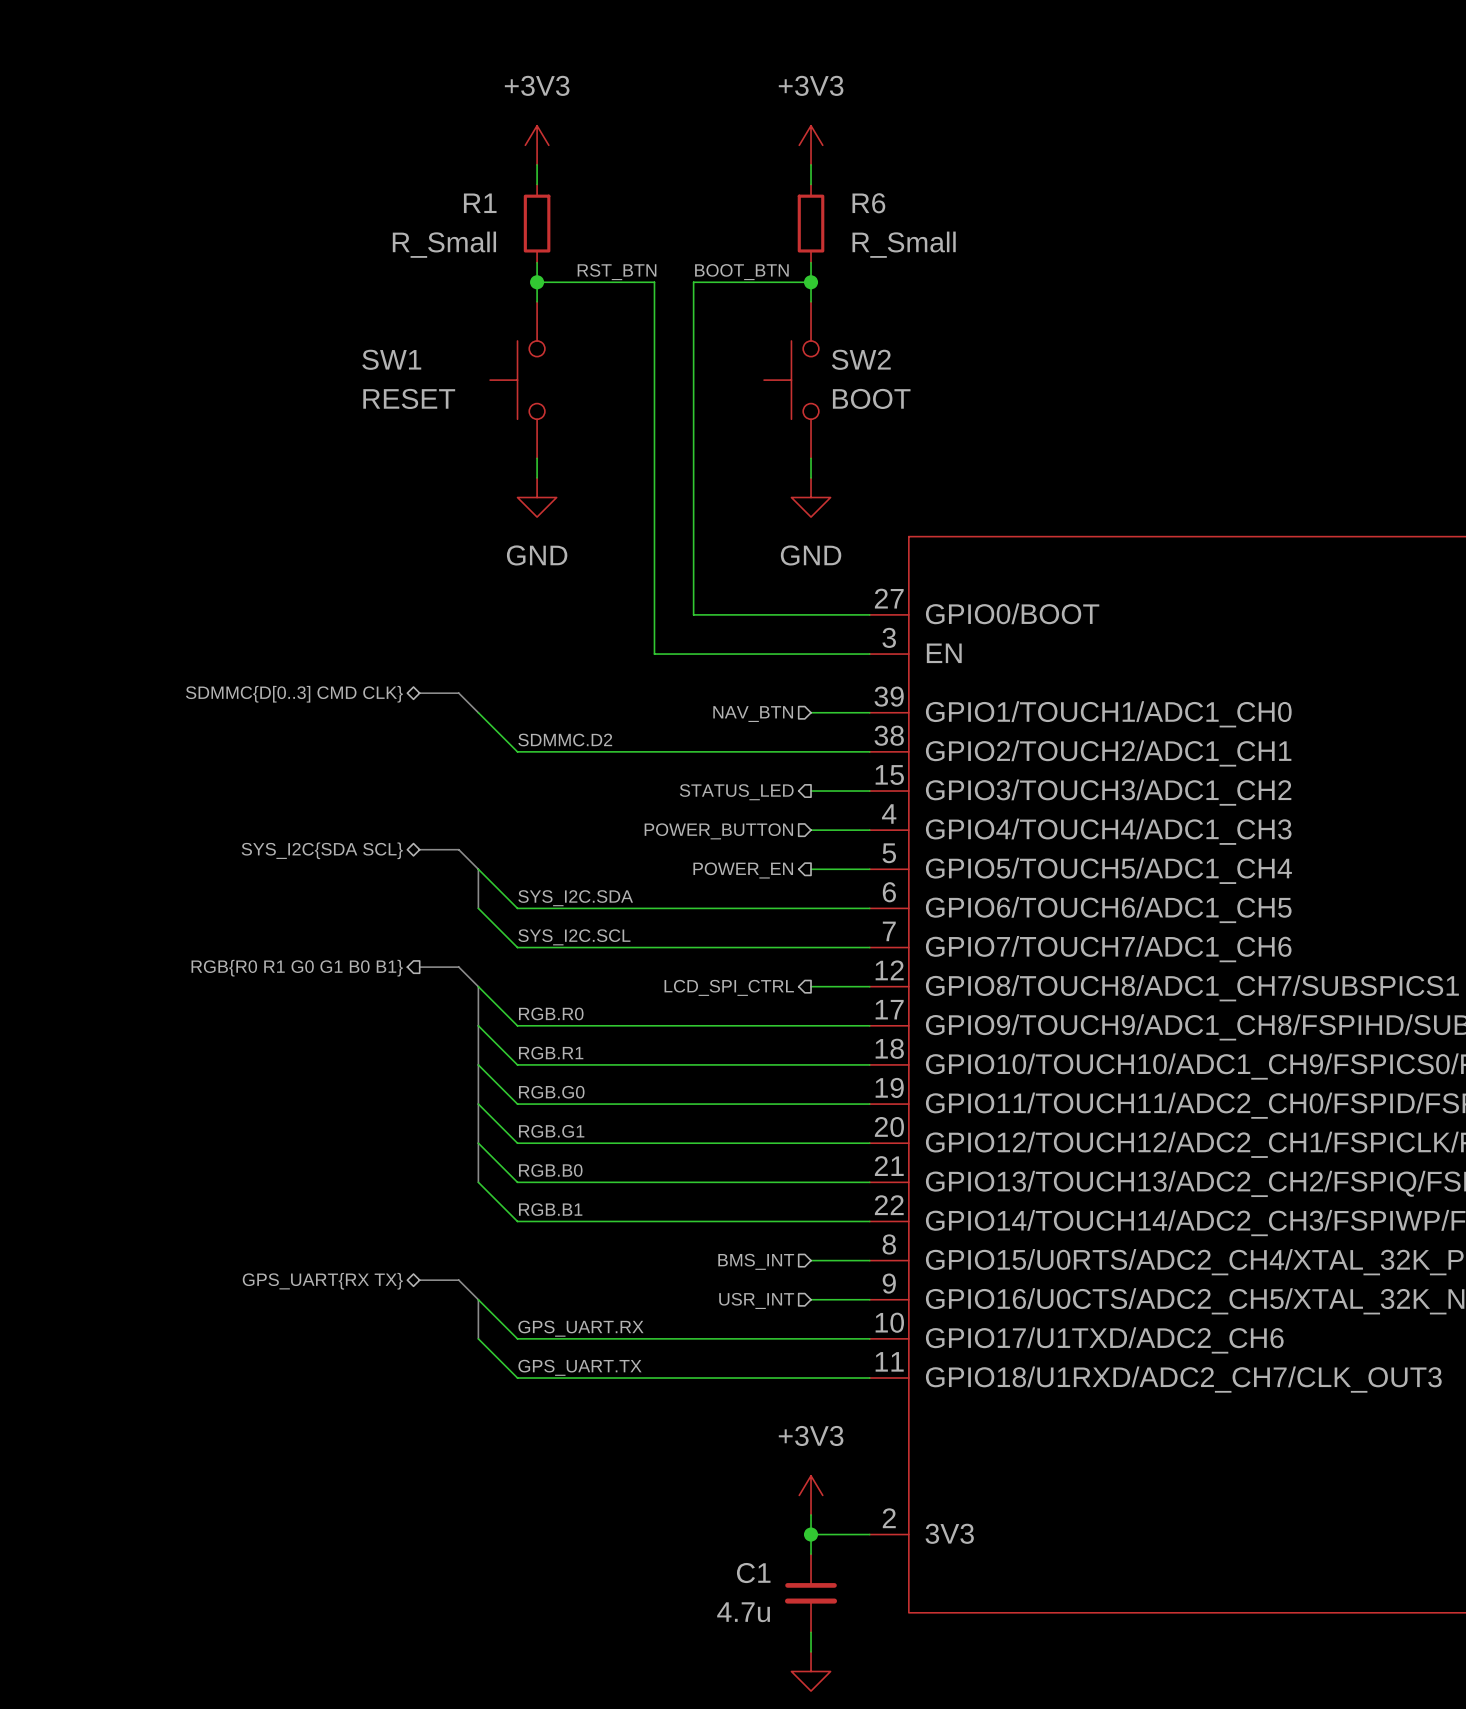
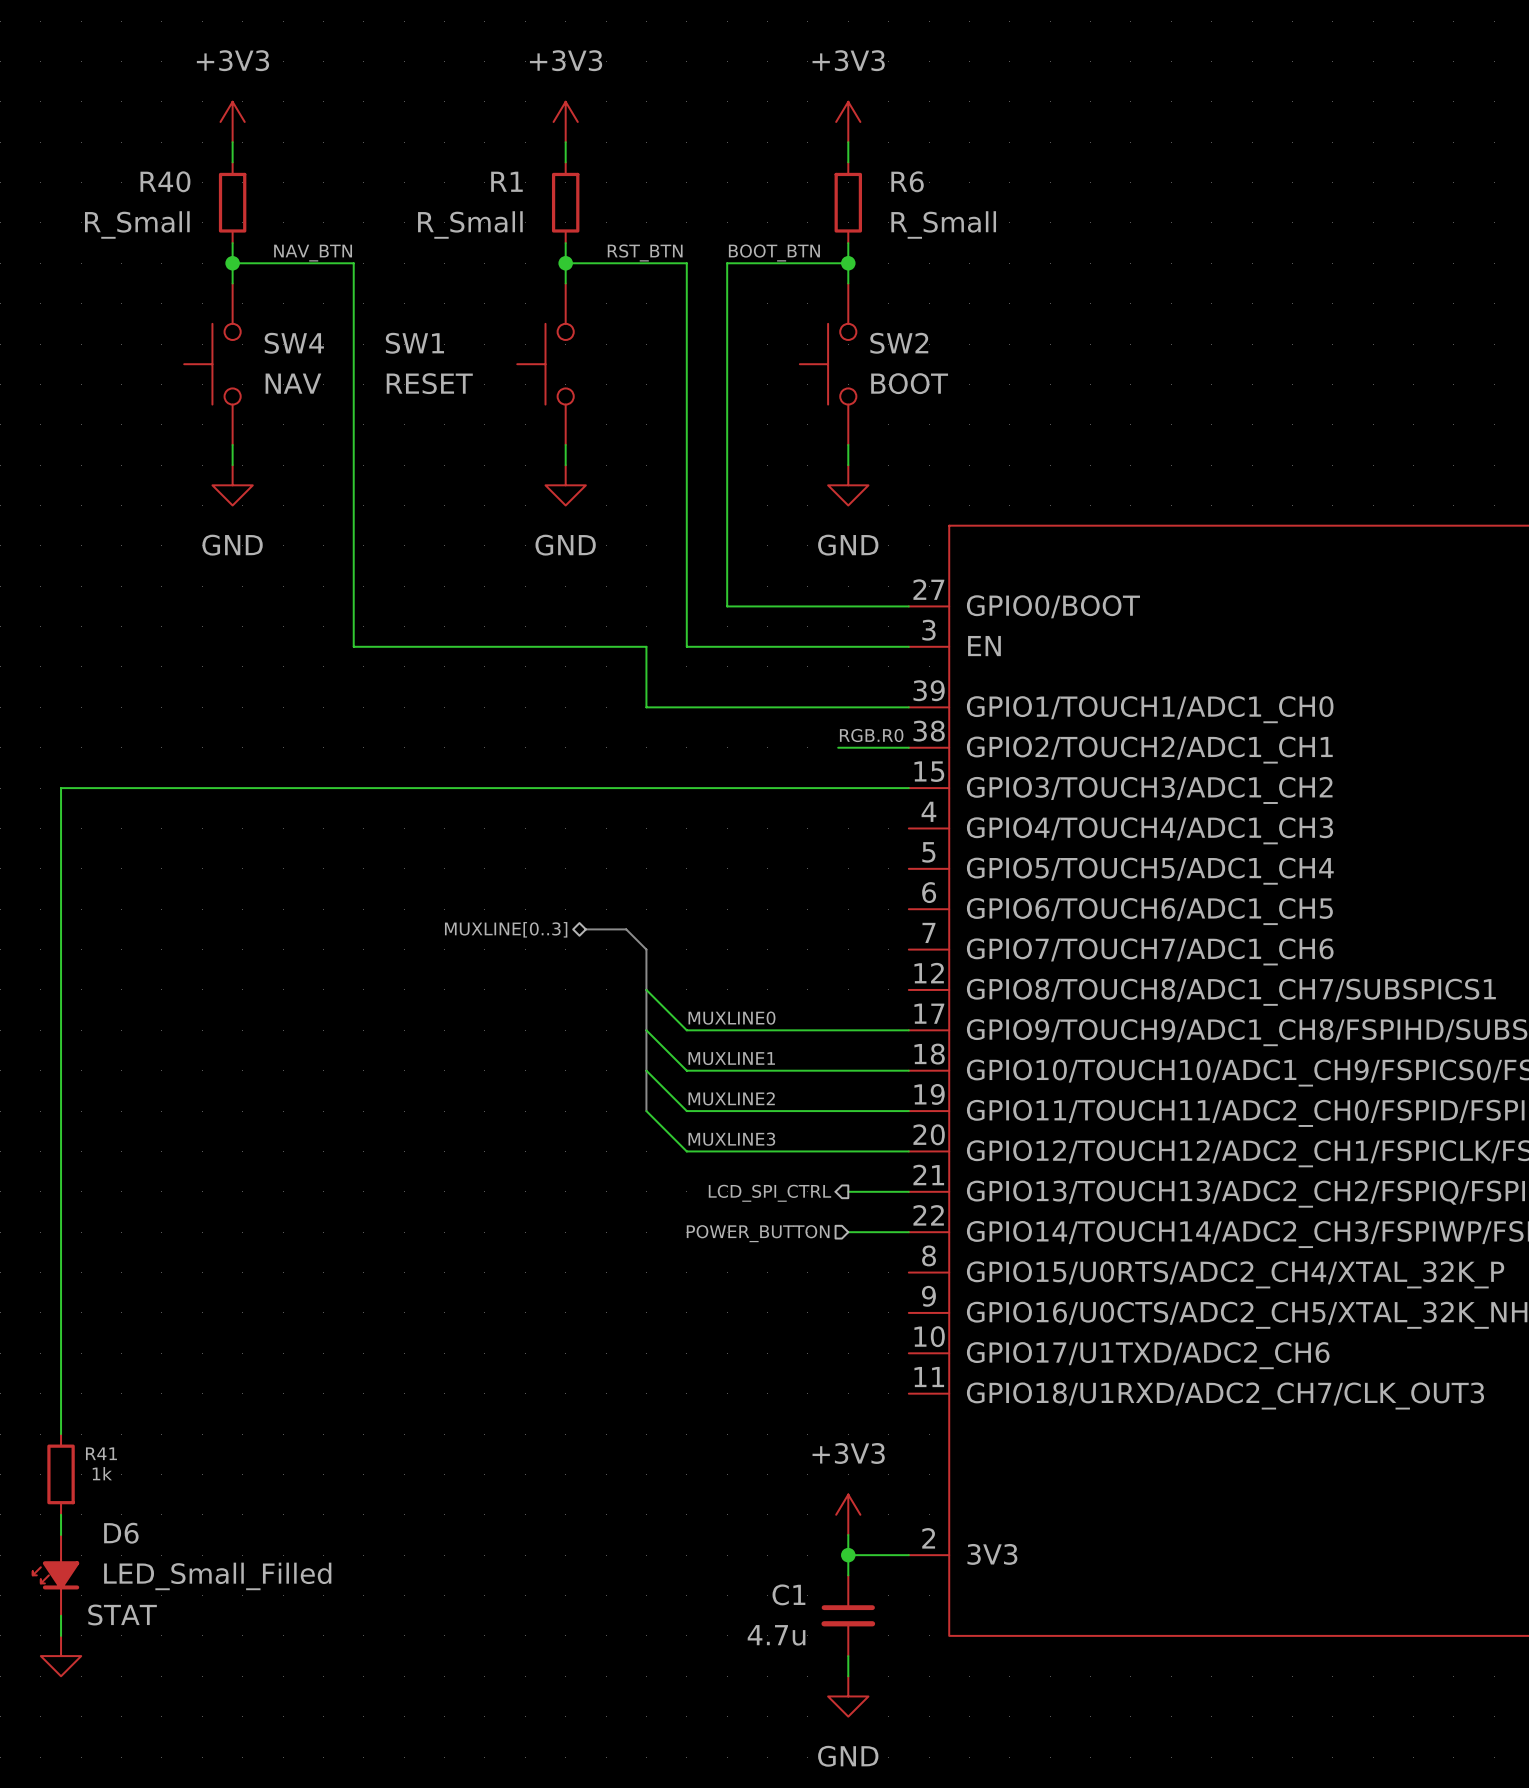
power symbol: none -> +3V3 (232, 121)
wire: none -> (232, 142) (232, 162)
R40: none -> R_Small (232, 202)
wire: none -> (232, 243) (232, 283)
label: none -> NAV_BTN (313, 253)
wire: none -> (232, 263) (353, 263) (353, 646) (646, 646) (646, 707) (848, 707)
junction: none -> (232, 263)
SW4: none -> NAV (212, 364)
wire: none -> (232, 444) (232, 465)
power symbol: none -> GND (232, 485)
bus: (419, 693) (458, 693) (478, 712) -> none
hierarchical label: SDMMC{D[0..3] CMD CLK} (294, 694) -> none
wire: (478, 712) (517, 751) (801, 751) -> none
hierarchical label: NAV_BTN (753, 714) -> none
label: SDMMC.D2 (565, 740) -> none
label: none -> RGB.R0 (871, 735)
wire: none -> (848, 788) (61, 788) (61, 1434)
hierarchical label: STATUS_LED (736, 792) -> none
wire: (811, 830) (869, 830) -> none
hierarchical label: POWER_BUTTON (718, 831) -> none
bus: (419, 849) (458, 849) (478, 869) (478, 908) -> none
hierarchical label: SYS_I2C{SDA SCL} (322, 850) -> none
wire: (478, 869) (517, 908) (869, 908) -> none
wire: (811, 869) (869, 869) -> none
hierarchical label: POWER_EN (743, 870) -> none
label: SYS_I2C.SDA (575, 898) -> none
wire: (478, 908) (517, 947) (869, 947) -> none
bus: none -> (585, 929) (626, 929) (646, 949) (646, 1111)
hierarchical label: none -> MUXLINE[0..3] (506, 929)
label: SYS_I2C.SCL (574, 937) -> none
bus: (419, 967) (458, 967) (478, 986) (478, 1182) -> none
hierarchical label: RGB{R0 R1 G0 G1 B0 B1} (297, 968) -> none
wire: (478, 986) (517, 1025) (654, 1025) -> (646, 989) (686, 1030)
wire: (811, 986) (869, 986) -> none
hierarchical label position: LCD_SPI_CTRL (729, 987) -> LCD_SPI_CTRL (769, 1193)
label: RGB.R0 (551, 1013) -> none
label: none -> MUXLINE0 (731, 1018)
wire: (478, 1025) (517, 1064) (654, 1064) -> (646, 1030) (686, 1070)
label: RGB.R1 (551, 1053) -> none
label: none -> MUXLINE1 (731, 1058)
wire: (478, 1064) (517, 1104) (654, 1104) -> (646, 1070) (686, 1111)
label: RGB.G0 (551, 1092) -> none
label: none -> MUXLINE2 (731, 1098)
wire: (478, 1104) (517, 1143) (654, 1143) -> (646, 1111) (686, 1151)
label: RGB.G1 (551, 1131) -> none
label: none -> MUXLINE3 (731, 1139)
wire: (478, 1143) (517, 1182) (811, 1182) -> none
label: RGB.B0 (550, 1170) -> none
wire: (478, 1182) (517, 1221) (811, 1221) -> none
label: RGB.B1 (550, 1209) -> none
hierarchical label: none -> POWER_BUTTON (758, 1233)
wire: (811, 1260) (869, 1260) -> none
hierarchical label: BMS_INT (756, 1261) -> none
bus: (419, 1280) (458, 1280) (478, 1299) (478, 1338) -> none
hierarchical label: GPS_UART{RX TX} (322, 1281) -> none
wire: (478, 1299) (517, 1338) (869, 1338) -> none
wire: (811, 1299) (869, 1299) -> none
hierarchical label: USR_INT (756, 1300) -> none
label: GPS_UART.RX (580, 1328) -> none
wire: (478, 1338) (517, 1378) (869, 1378) -> none
label: GPS_UART.TX (580, 1367) -> none
R41: none -> 1k (61, 1474)
wire: none -> (61, 1514) (61, 1534)
D6: none -> LED_Small_Filled (55, 1575)
wire: none -> (61, 1615) (61, 1635)
power symbol: none -> (61, 1656)

